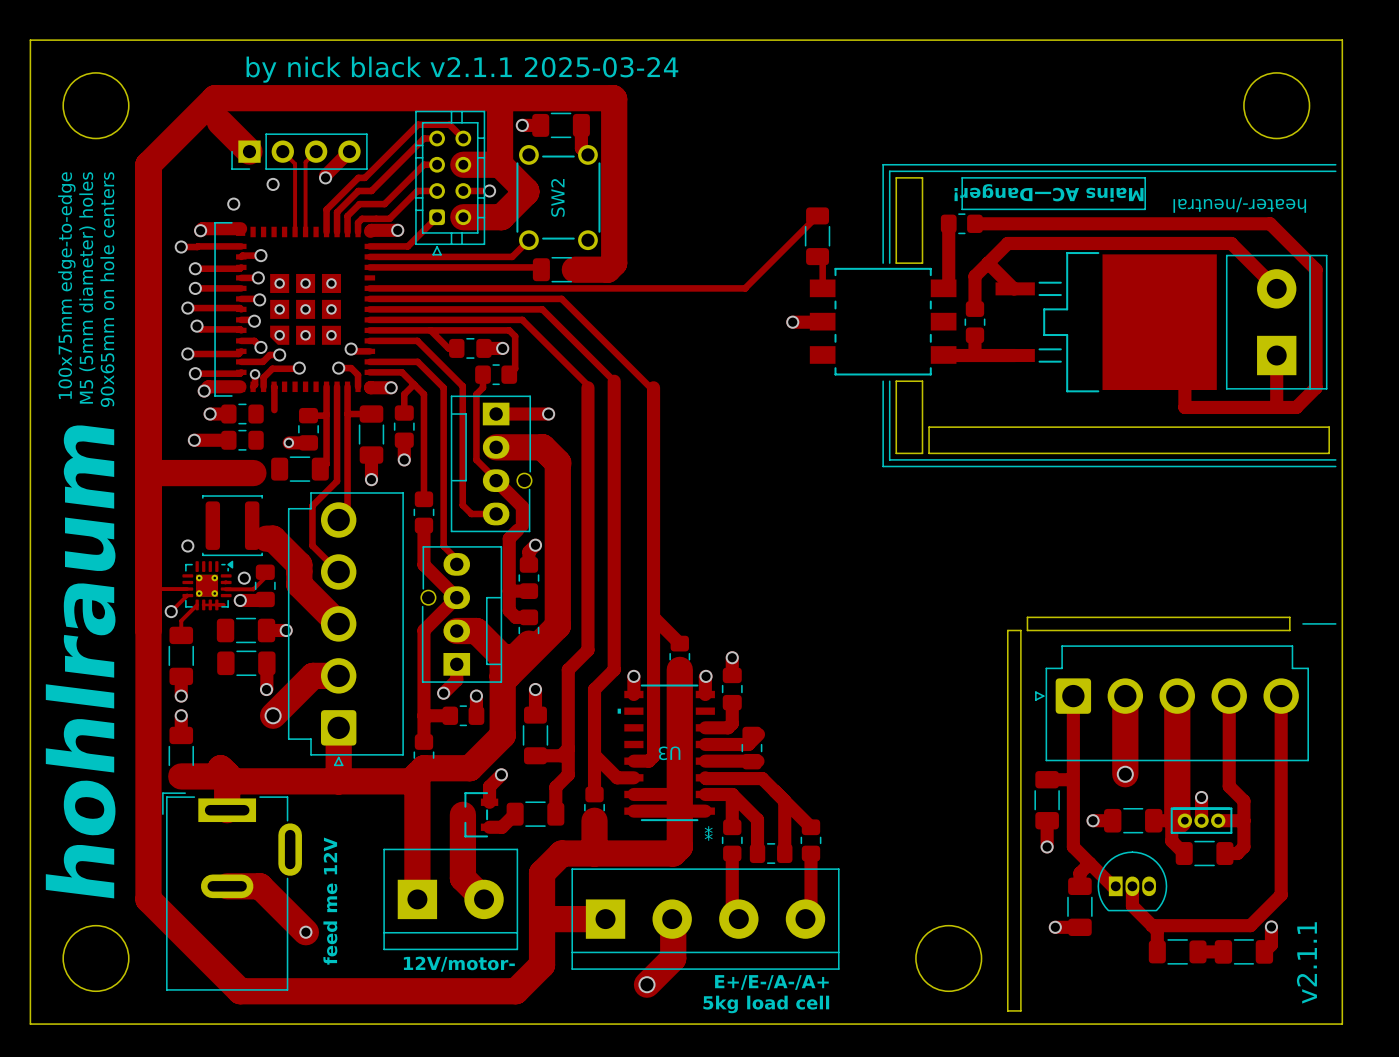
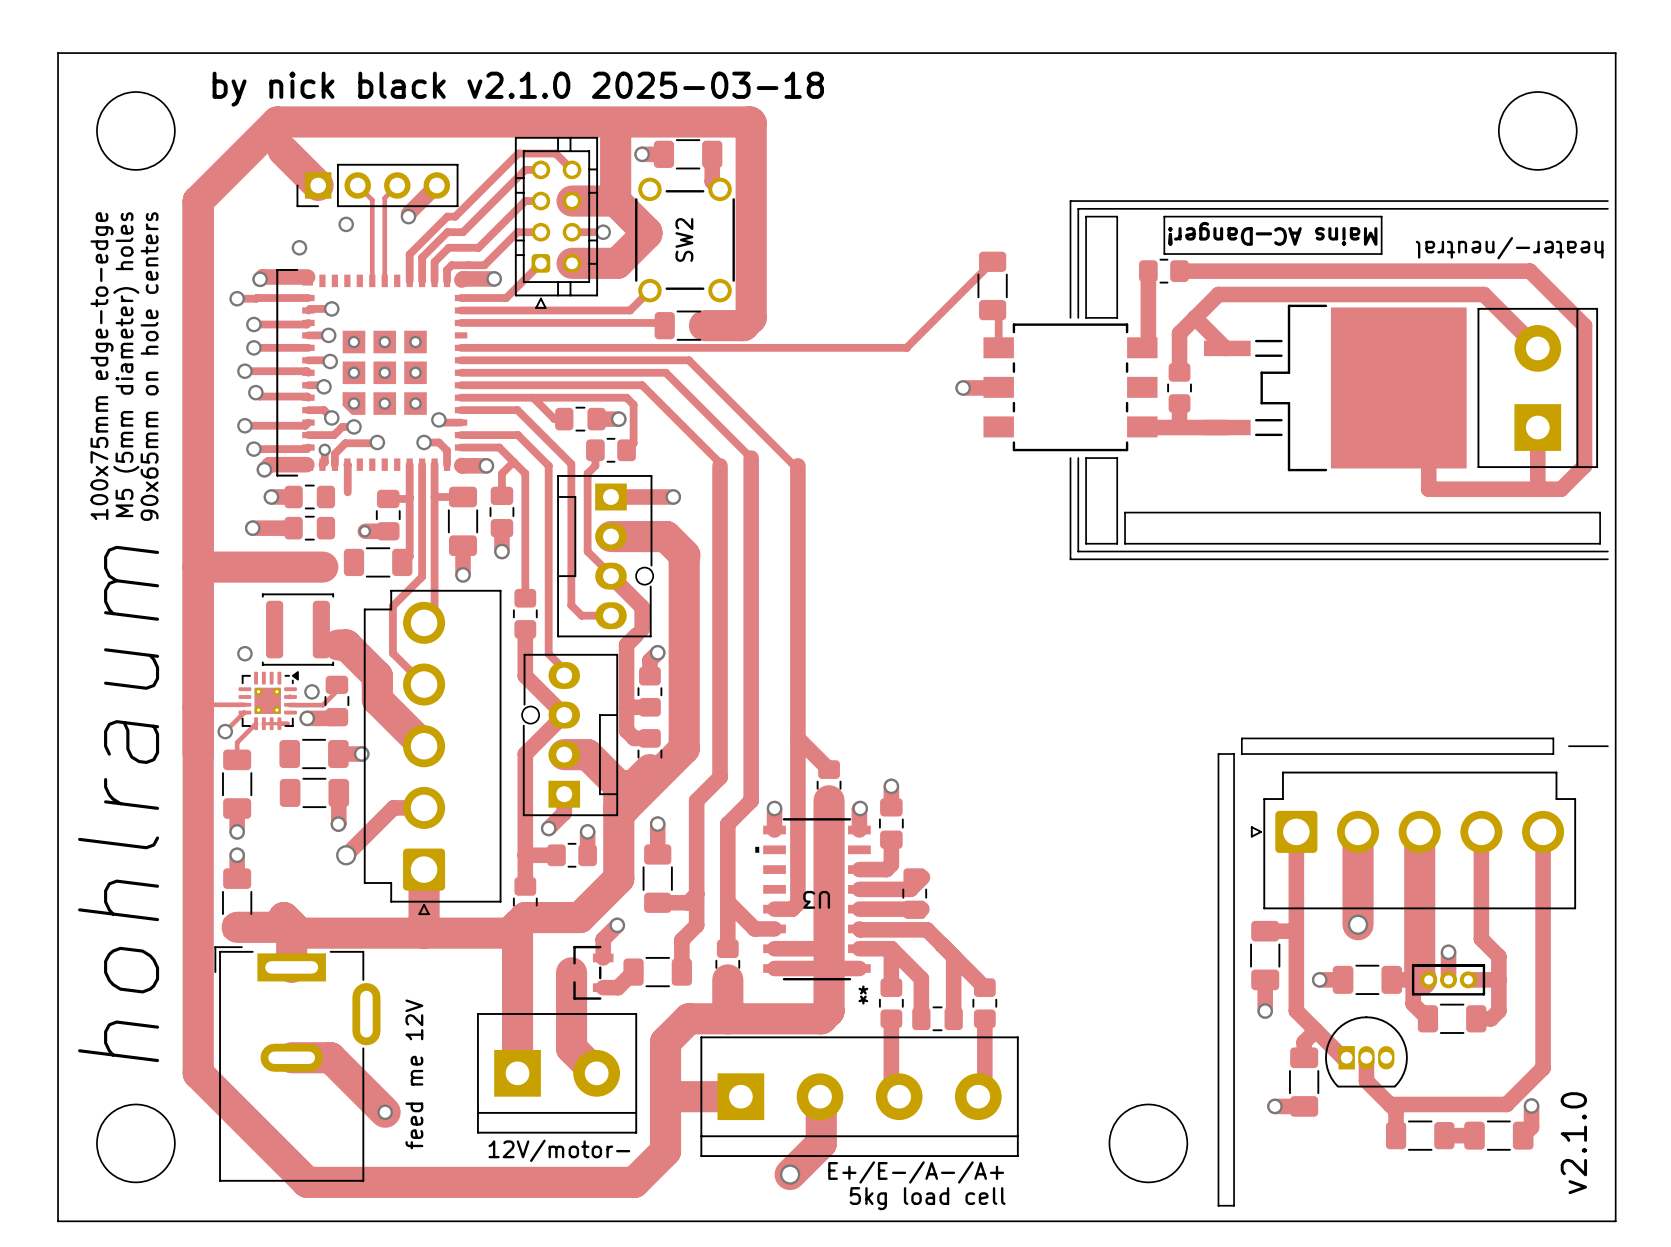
text: by nick black v2.1.1 2025-03-24 (462, 69) -> by nick black v2.1.0 2025-03-18 (518, 89)
top track width: thick (338, 675) (312, 675) (273, 715) -> thin (424, 807) (393, 807) (346, 855)
text: v2.1.1 (1306, 962) -> v2.1.0 (1573, 1143)

